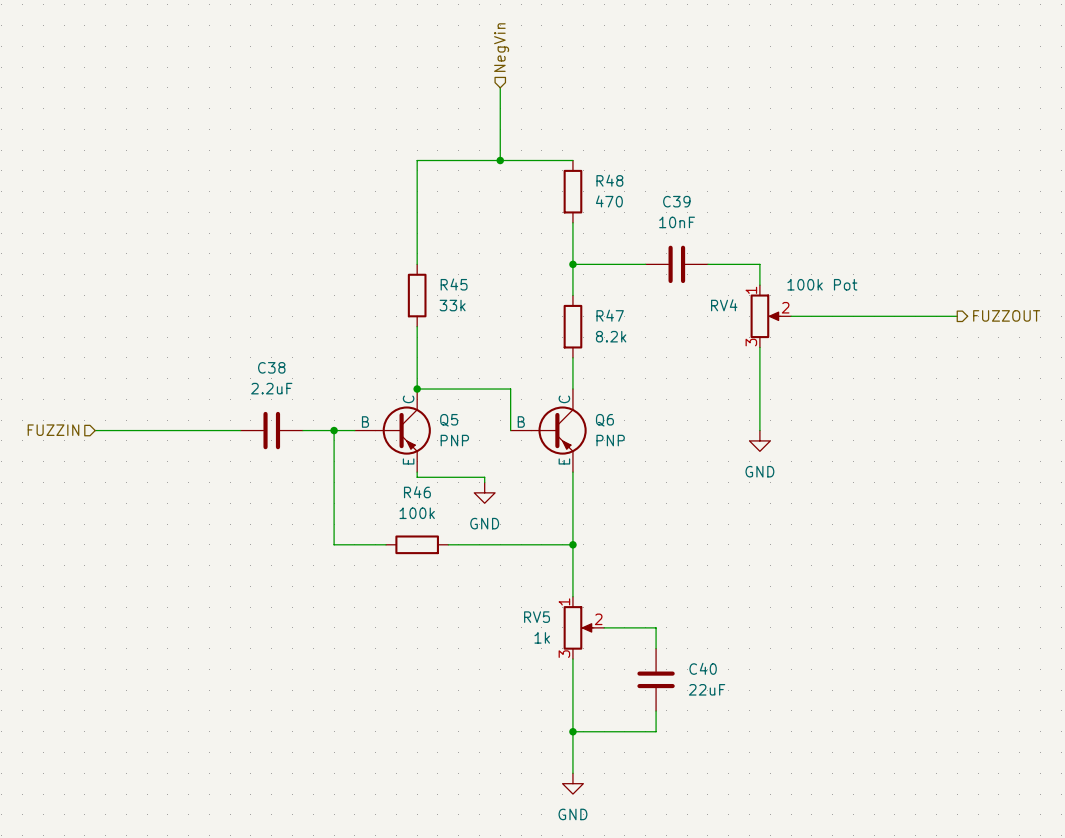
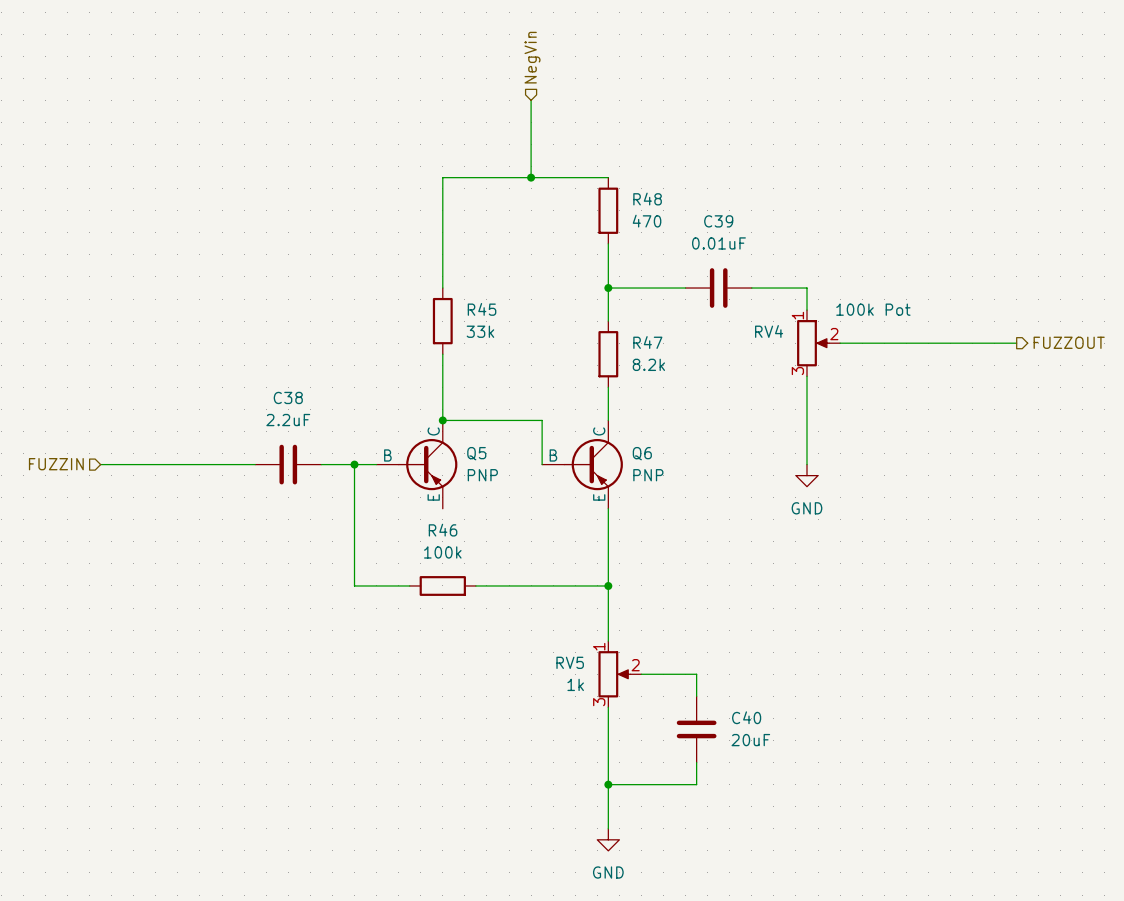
C39 value: 10nF (677, 222) -> 0.01uF (718, 243)
wire: (417, 472) (417, 477) (484, 477) (484, 482) -> none
power symbol: GND (484, 492) -> none
C40 value: 22uF (707, 689) -> 20uF (750, 740)

